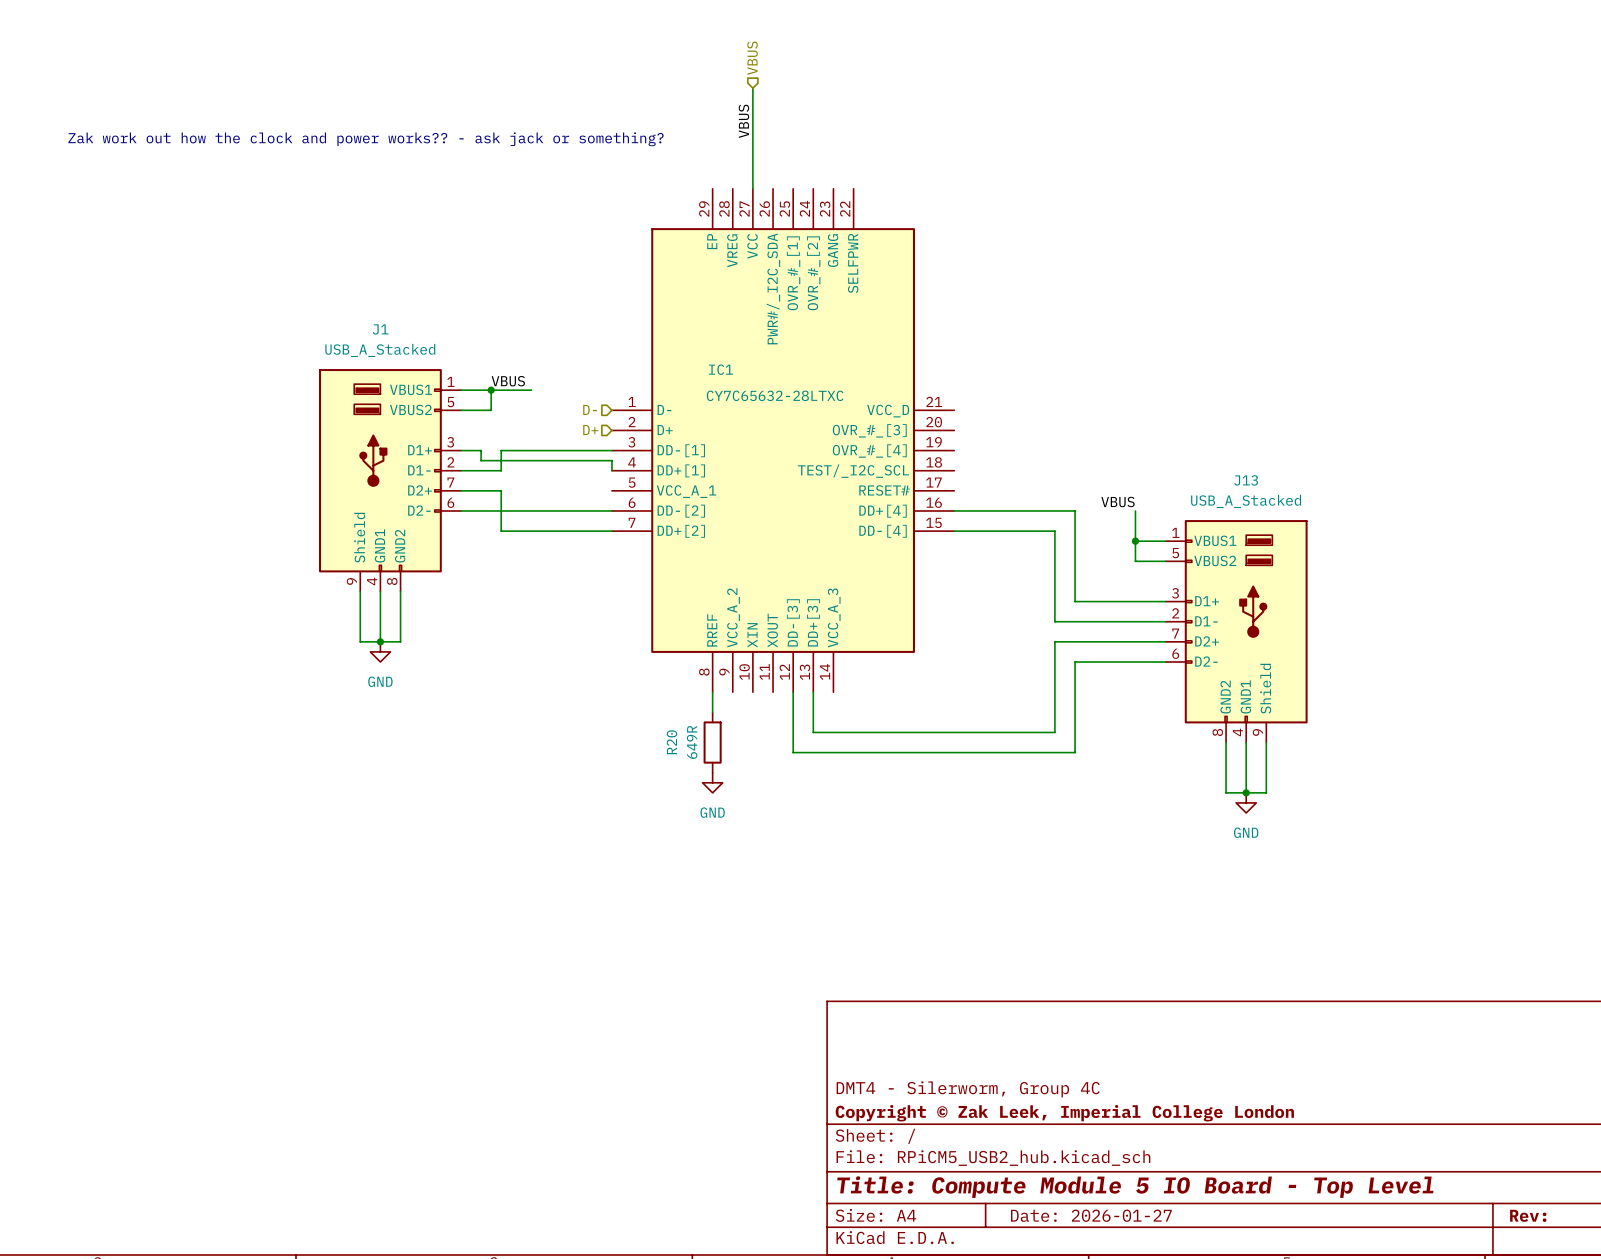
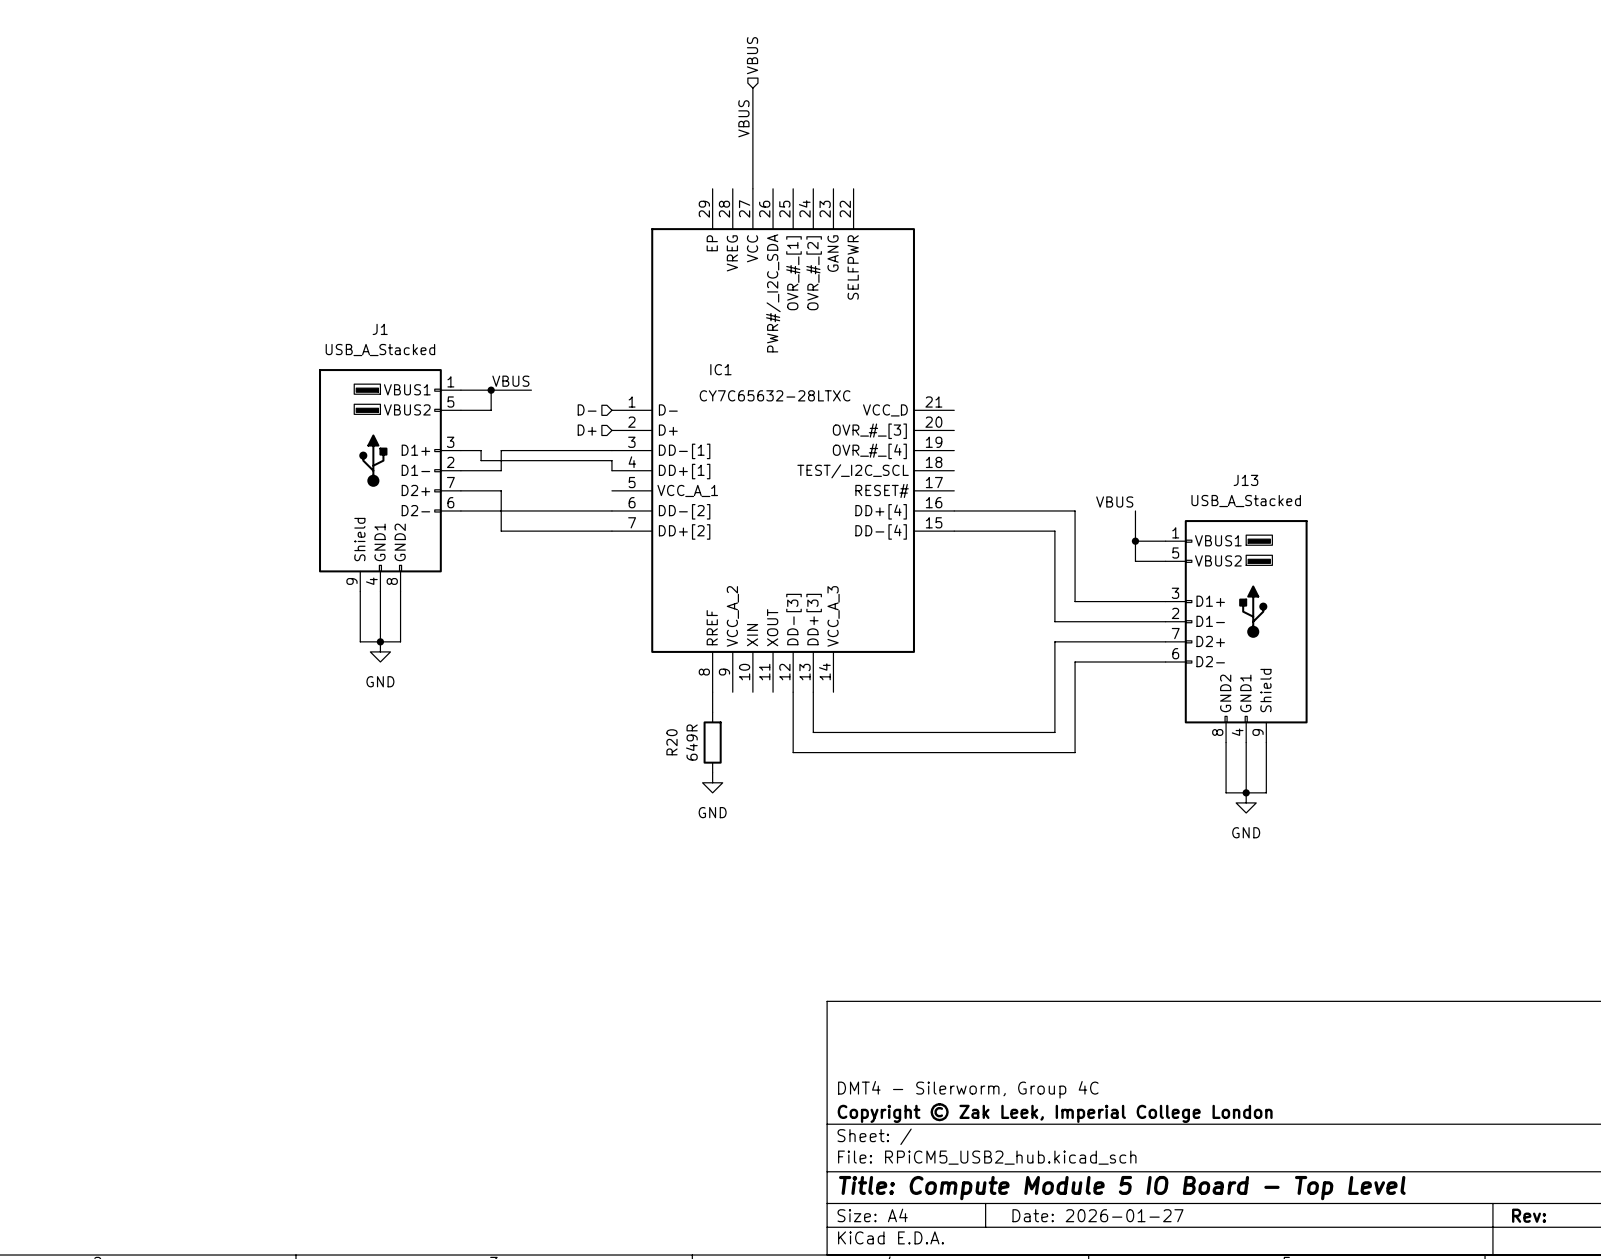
text: Zak work out how the clock and power works?? - ask jack or something? (366, 139) -> none

